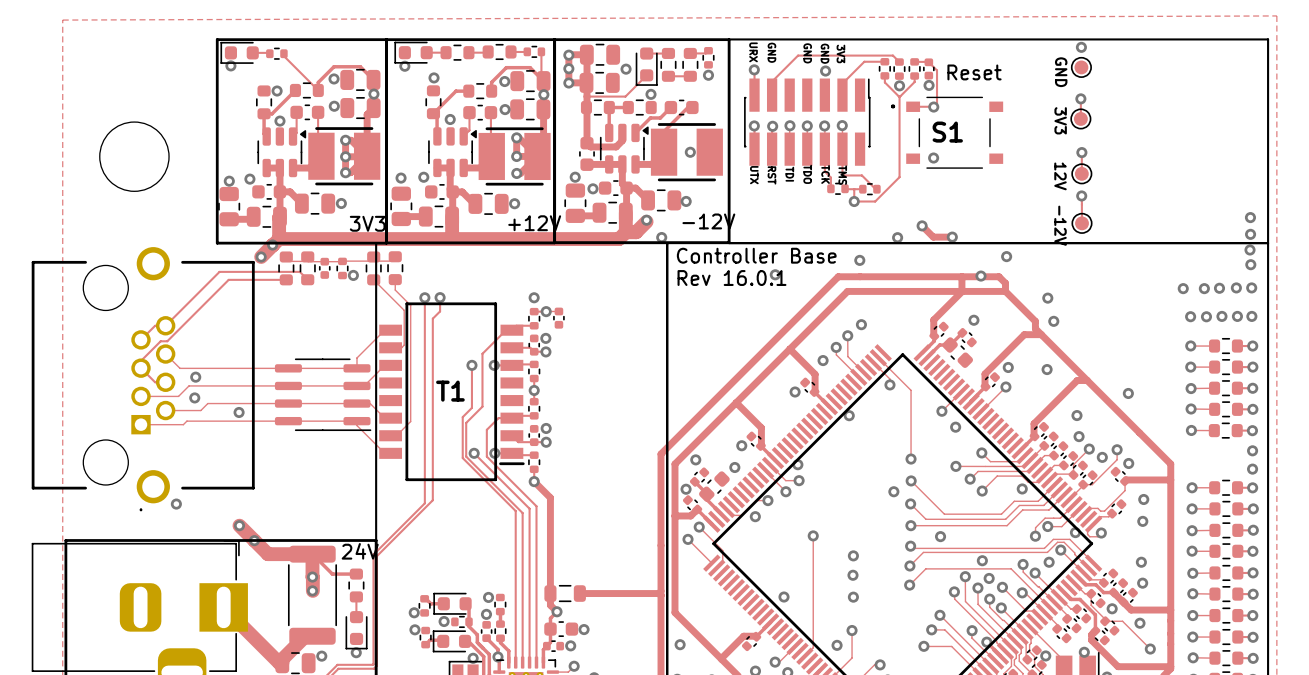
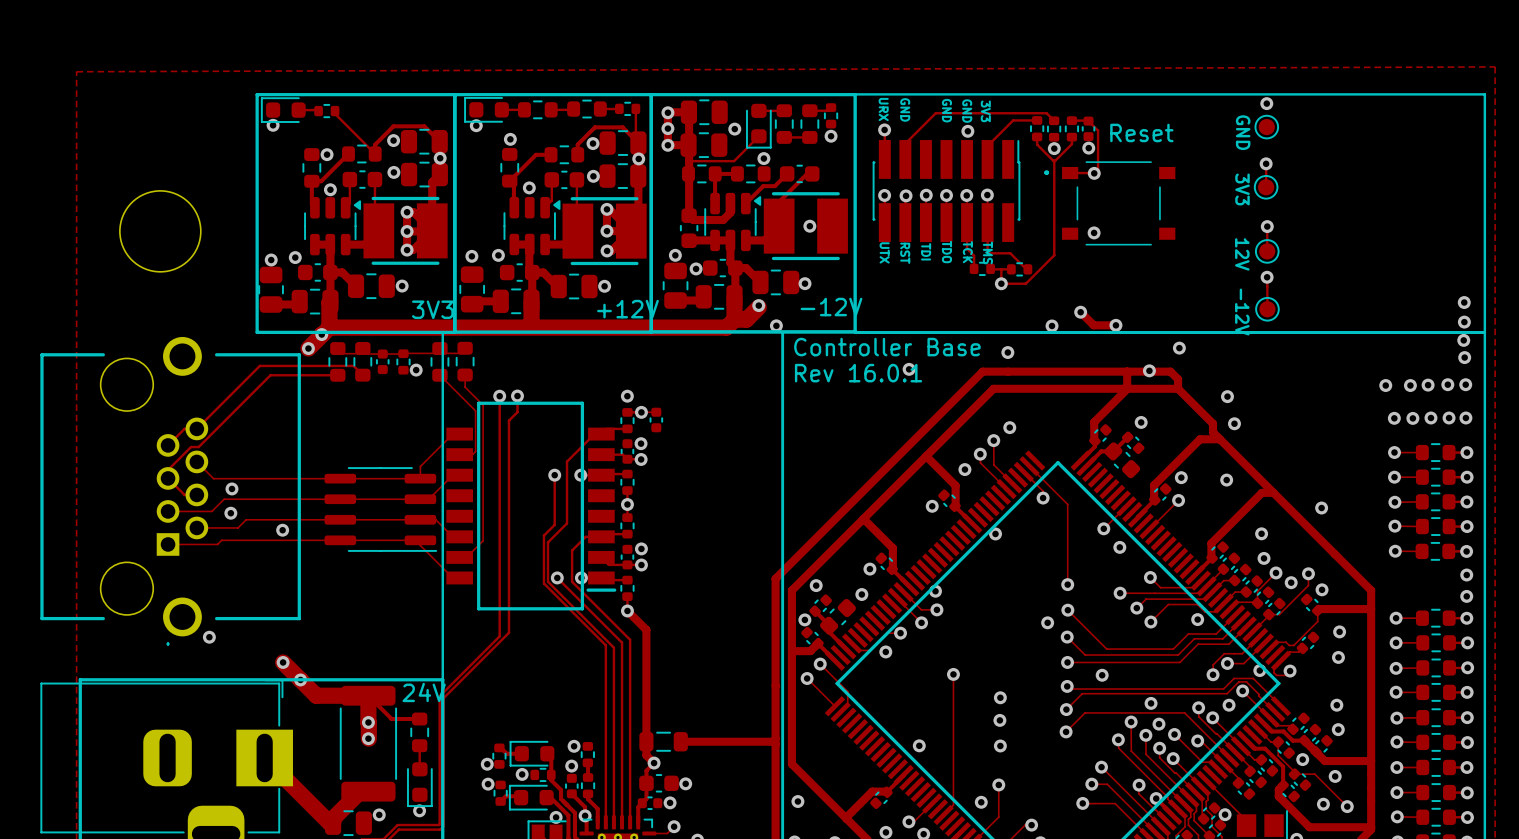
S1 name: S1 (947, 132) -> none
T1 name: T1 (450, 391) -> none
via position: (1084, 652) -> (1323, 804)

